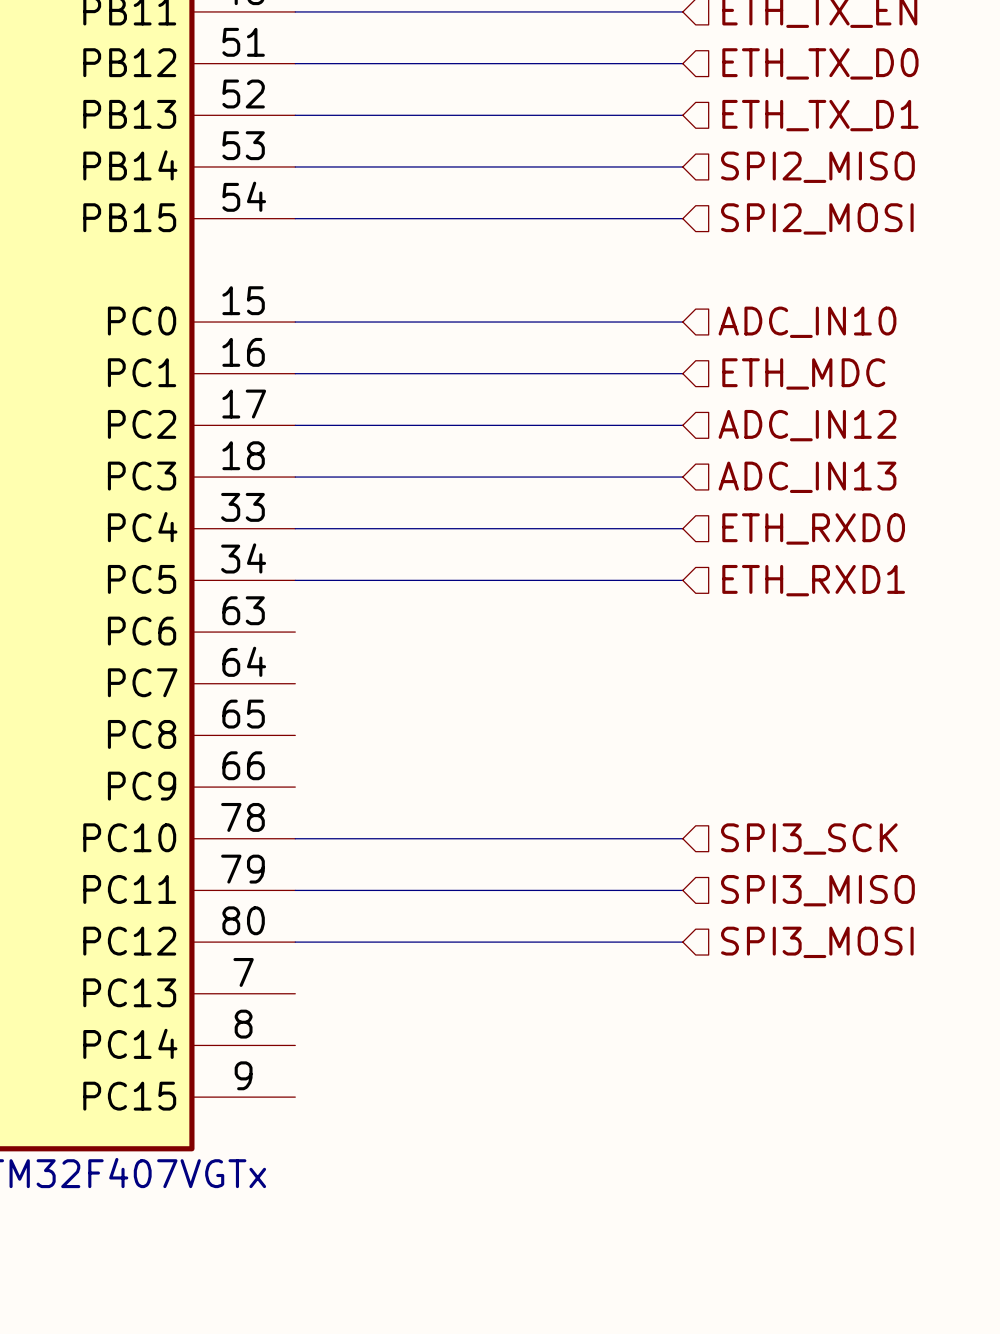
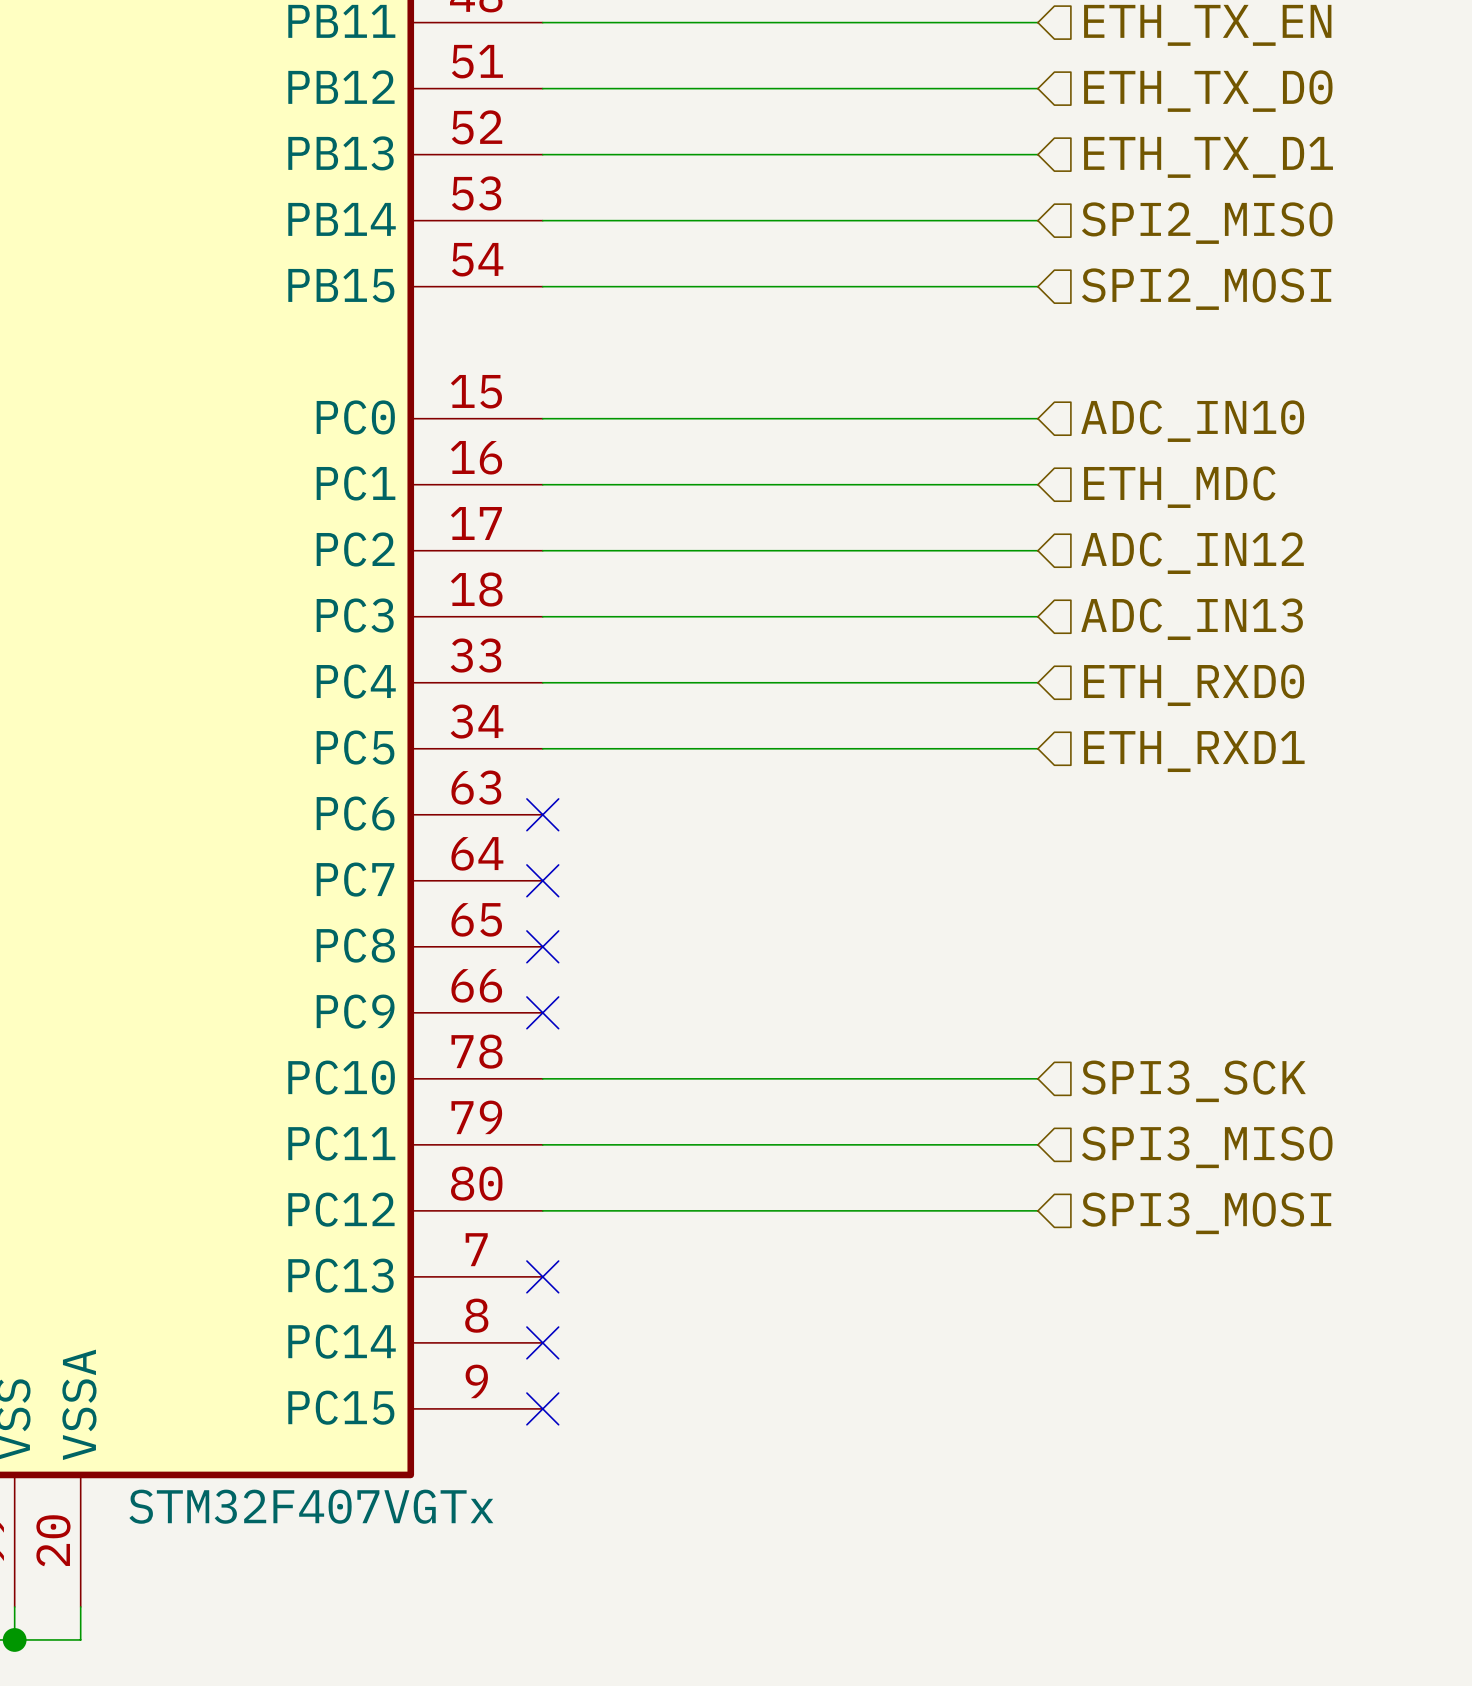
no-connect mark: none -> (542, 814)
no-connect mark: none -> (542, 880)
no-connect mark: none -> (542, 946)
no-connect mark: none -> (542, 1012)
no-connect mark: none -> (542, 1276)
no-connect mark: none -> (542, 1342)
no-connect mark: none -> (542, 1408)

